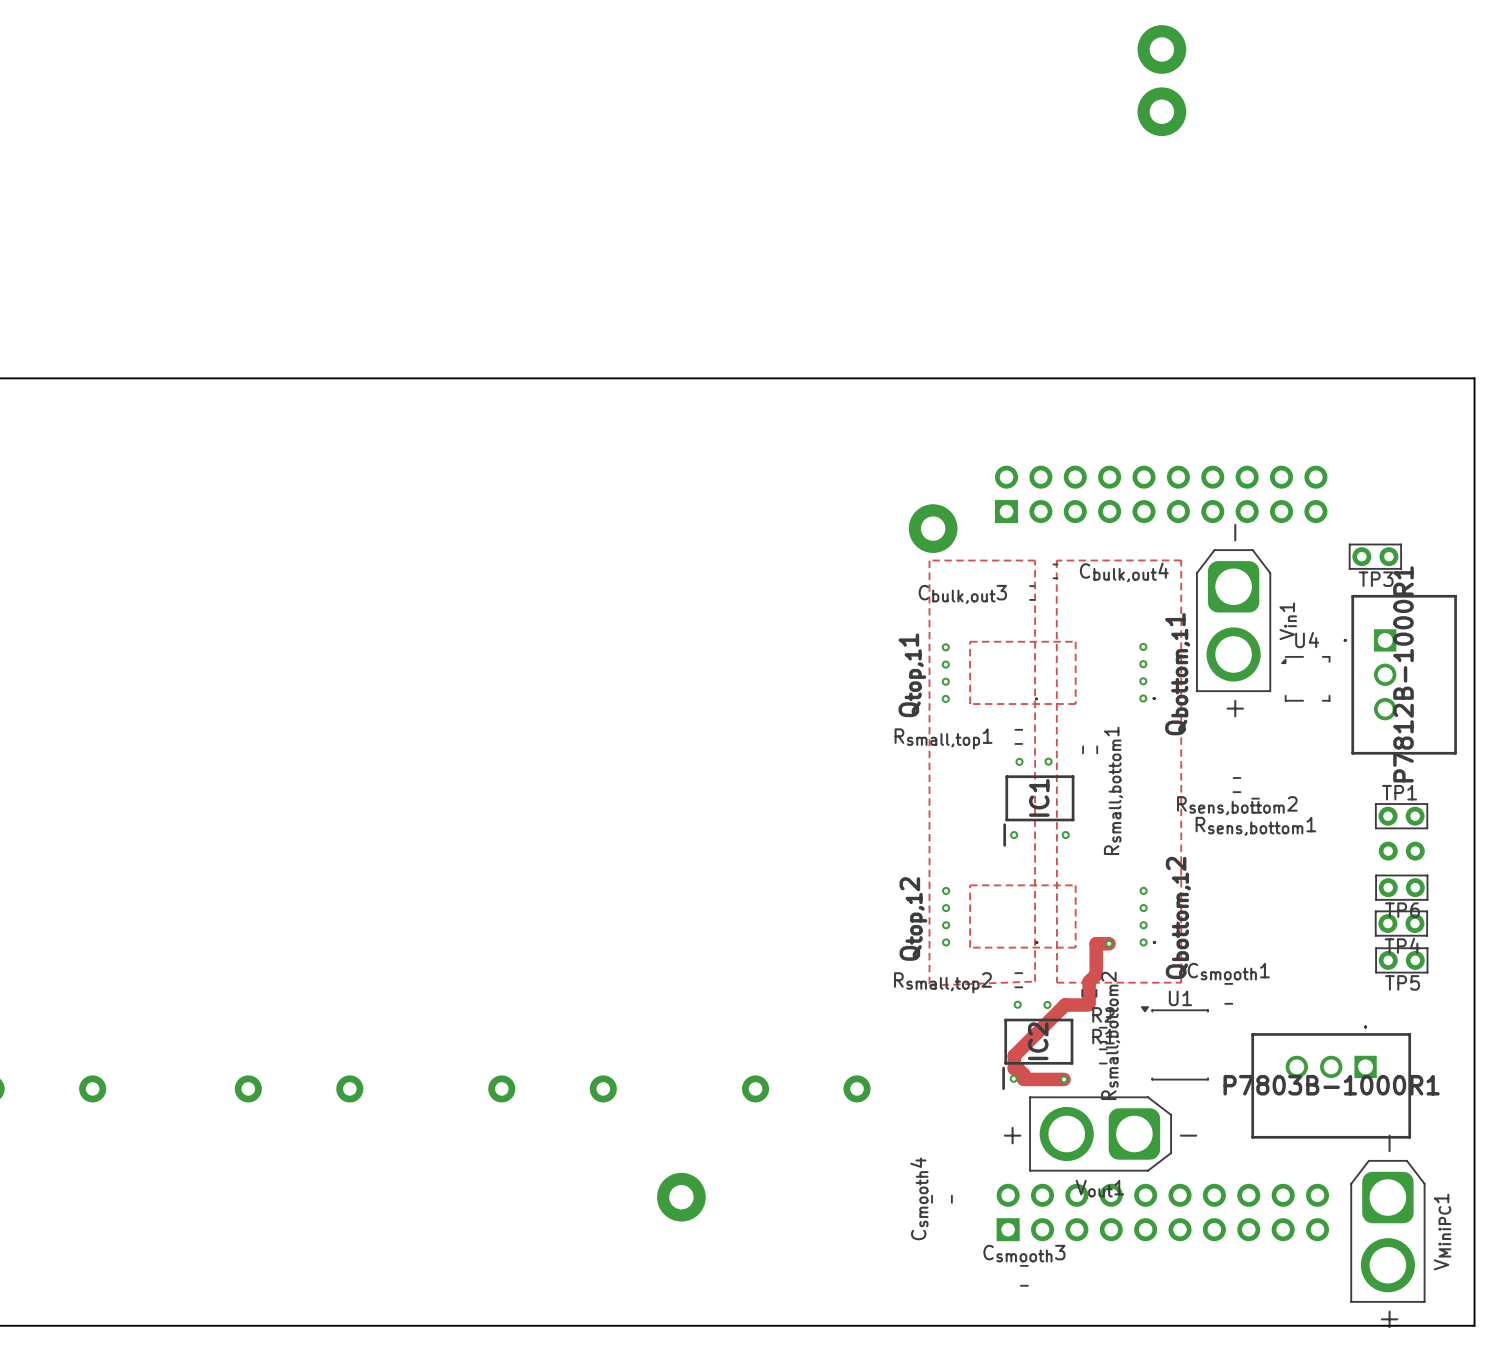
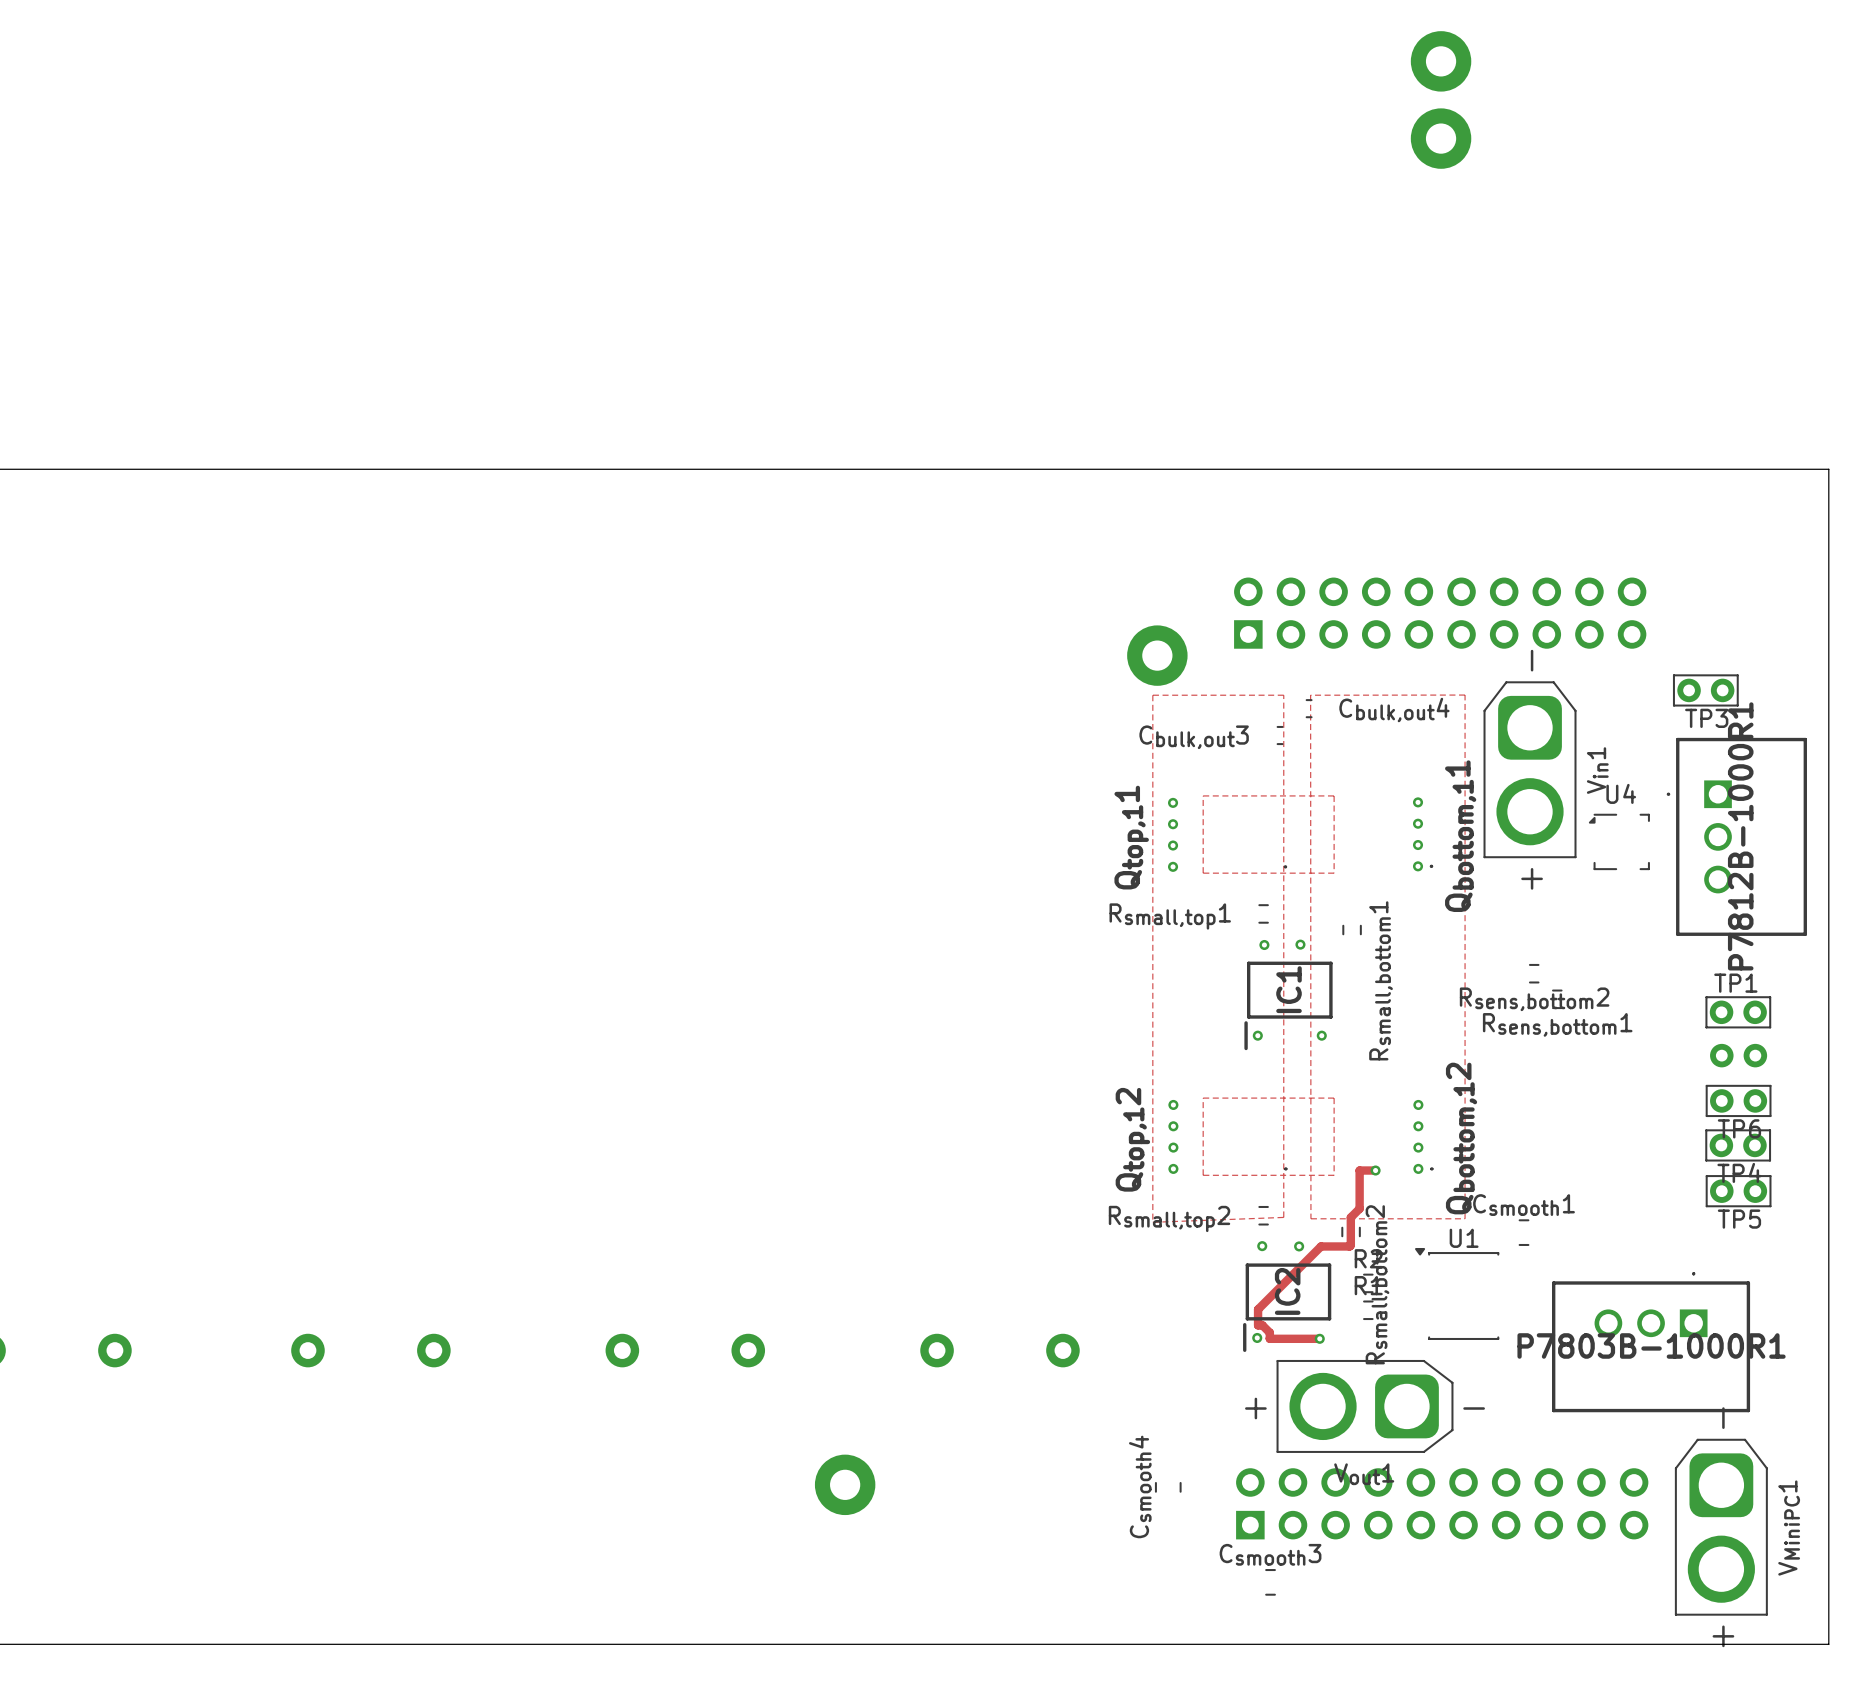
track width: thick (1109, 943) (1096, 943) (1096, 974) (1089, 981) (1089, 1003) -> thin (1375, 1170) (1359, 1170) (1359, 1208) (1350, 1217) (1350, 1245)
track width: thick (1088, 1005) (1065, 1005) (1014, 1055) (1014, 1068) (1017, 1068) (1023, 1074) (1023, 1079) -> thin (1349, 1246) (1321, 1246) (1258, 1309) (1258, 1325) (1262, 1325) (1269, 1332) (1269, 1338)
track width: thick (1023, 1079) (1064, 1079) -> thin (1269, 1338) (1319, 1338)

